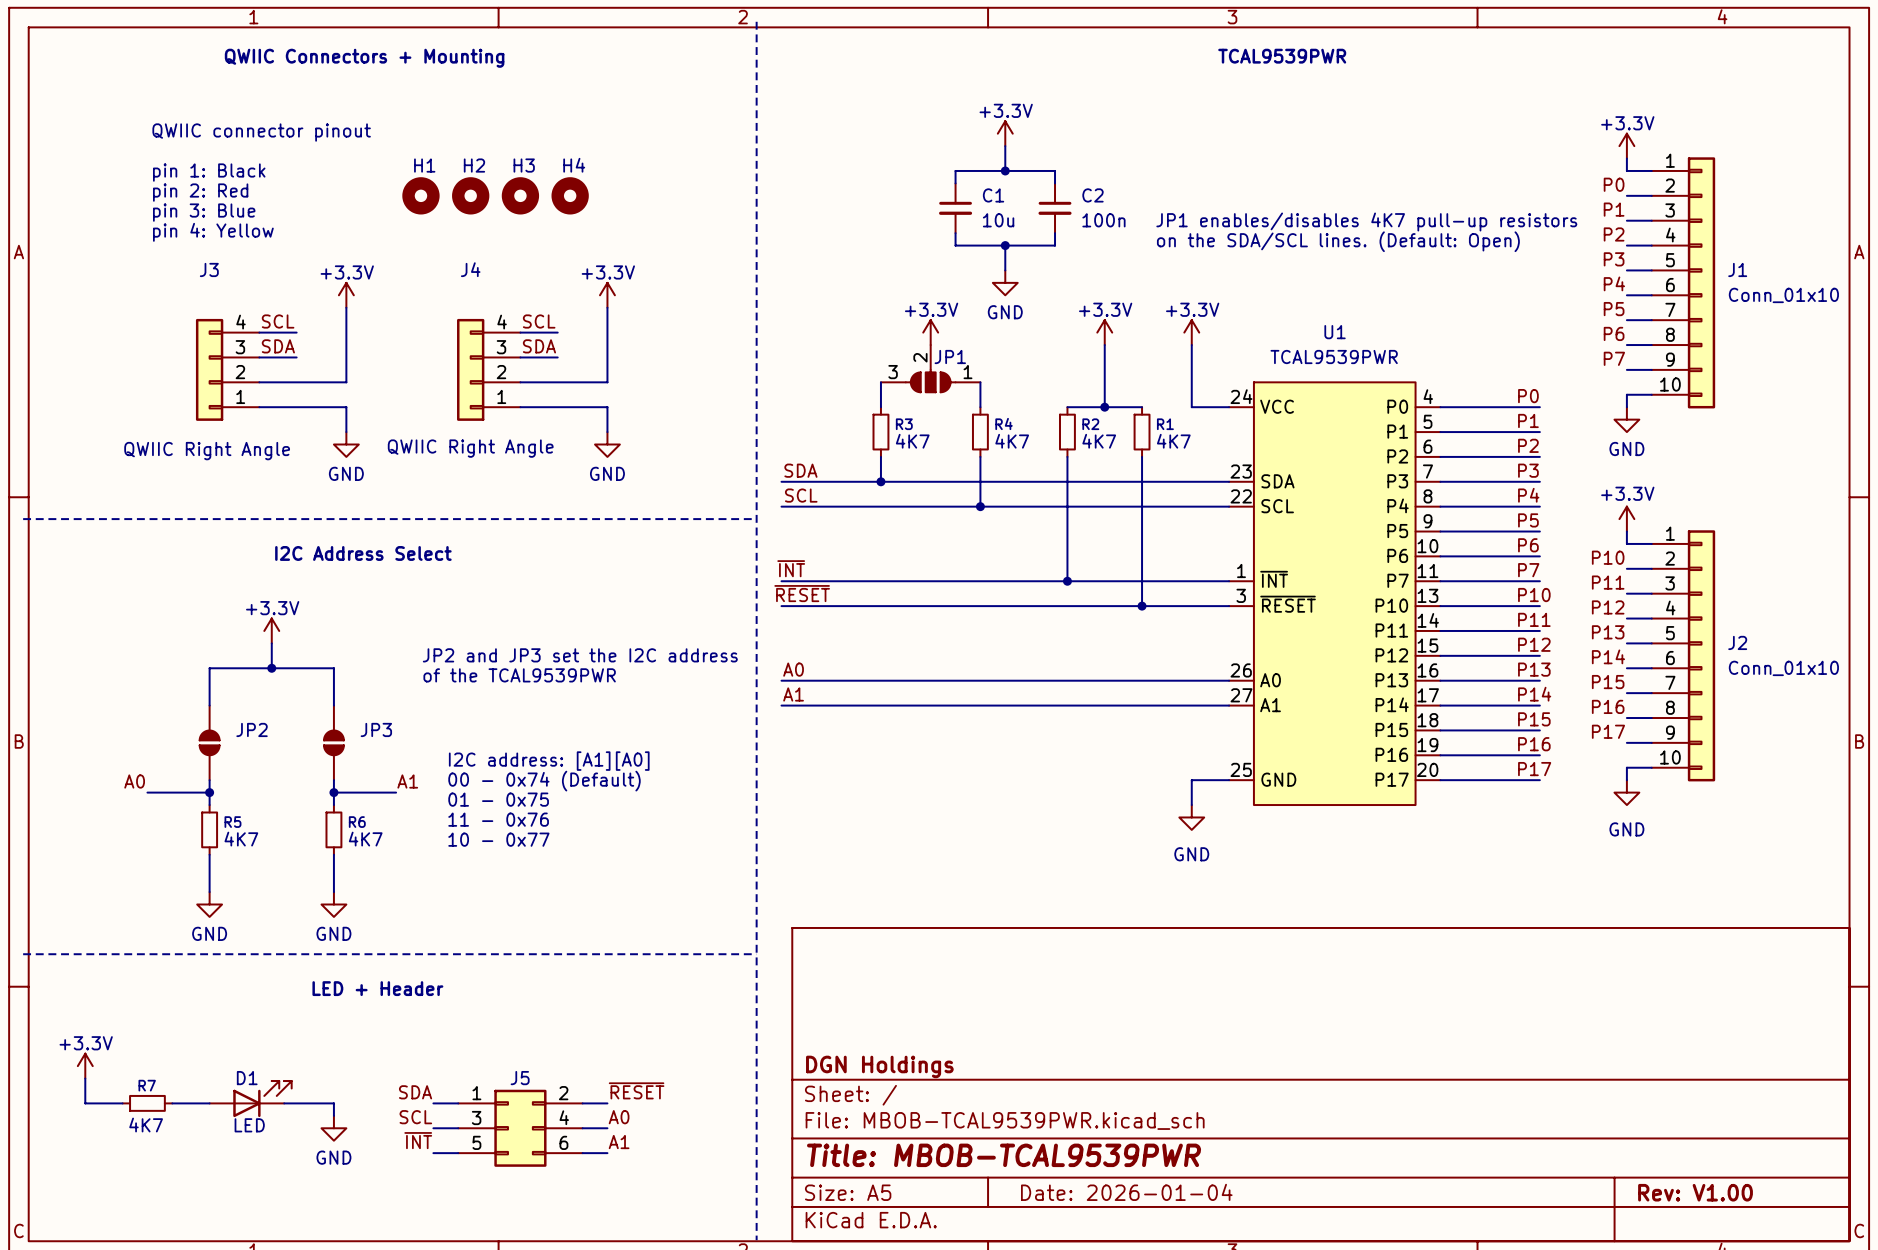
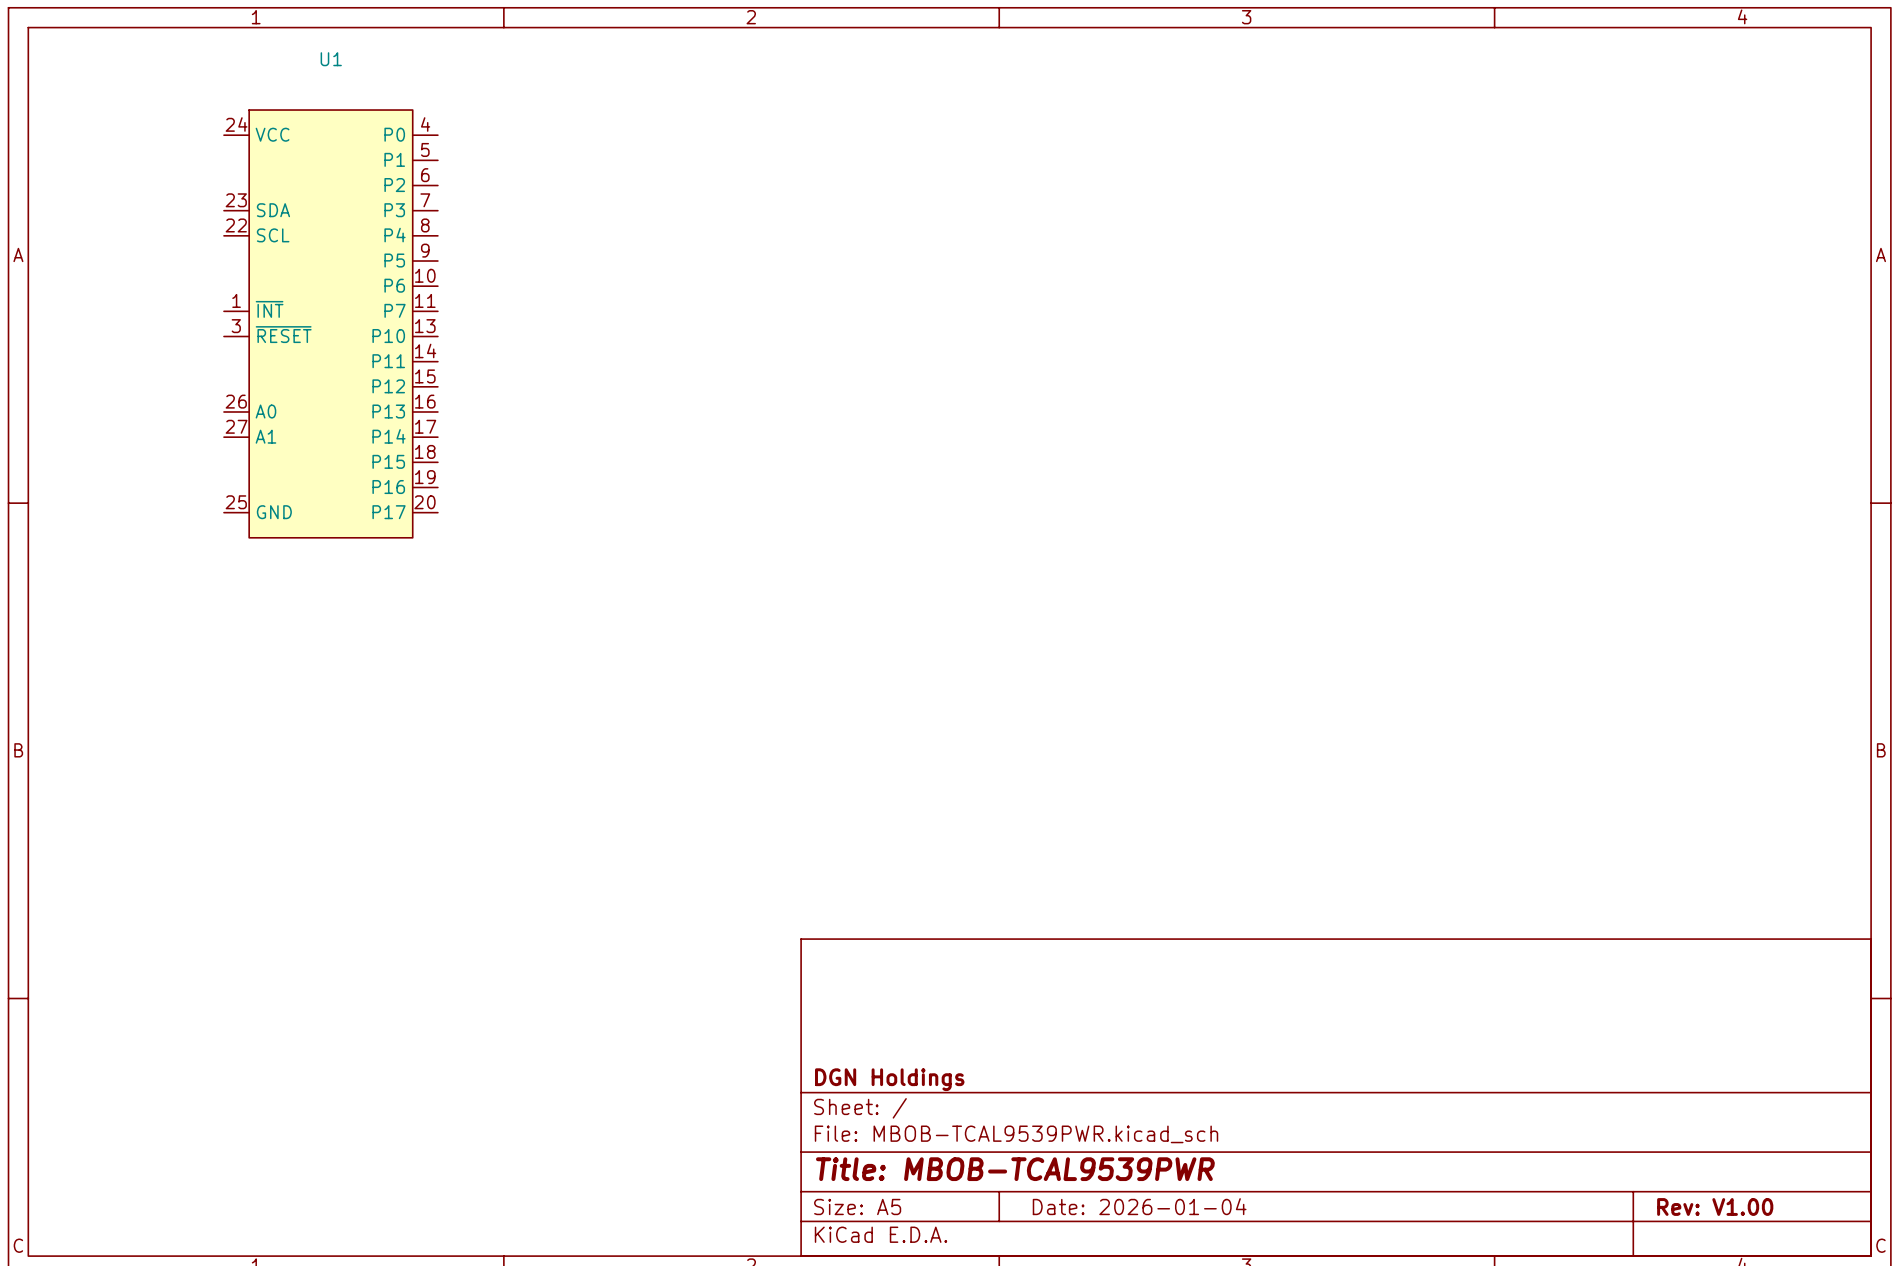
line: (756, 21) (756, 1240) -> none
text: TCAL9539PWR (1282, 56) -> none
text: QWIIC Connectors + Mounting (364, 58) -> none
text: QWIIC connector pinout (261, 132) -> none
power symbol: +3.3V (1005, 133) -> none
wire: (1005, 146) (1005, 170) -> none
power symbol: +3.3V (1626, 146) -> none
wire: (1626, 158) (1626, 170) (1651, 170) -> none
junction: (1005, 170) -> none
text: pin 1: Black (209, 172) -> none
wire: (955, 183) (955, 170) (1055, 170) (1055, 183) -> none
label: P0 (1614, 184) -> none
text: pin 2: Red (200, 192) -> none
H1: (420, 195) -> none
H2: (470, 195) -> none
H3: (520, 195) -> none
H4: (570, 195) -> none
wire: (1626, 195) (1651, 195) -> none
C1: 10u (955, 208) -> none
C2: 100n (1055, 208) -> none
label: P1 (1614, 209) -> none
text: pin 3: Blue (204, 212) -> none
wire: (1626, 220) (1651, 220) -> none
text: JP1 enables/disables 4K7 pull-up resistors (1366, 222) -> none
text: pin 4: Yellow (213, 232) -> none
wire: (955, 233) (955, 245) (1055, 245) (1055, 233) -> none
label: P2 (1614, 234) -> none
text: on the SDA/SCL lines. (Default: Open) (1338, 241) -> none
wire: (1005, 245) (1005, 270) -> none
junction: (1005, 245) -> none
wire: (1626, 245) (1651, 245) -> none
label: P3 (1614, 259) -> none
wire: (1626, 270) (1651, 270) -> none
power symbol: GND (1005, 282) -> none
J1: Conn_01x10 (1683, 282) -> none
label: P4 (1614, 283) -> none
power symbol: +3.3V (346, 295) -> none
power symbol: +3.3V (607, 295) -> none
wire: (1626, 295) (1651, 295) -> none
wire: (607, 307) (607, 382) (520, 382) -> none
label: P5 (1614, 309) -> none
wire: (1626, 320) (1651, 320) -> none
label: SCL (278, 321) -> none
label: SCL (539, 321) -> none
wire: (520, 332) (557, 332) -> none
power symbol: +3.3V (930, 332) -> none
power symbol: +3.3V (1104, 332) -> none
power symbol: +3.3V (1191, 332) -> none
label: P6 (1614, 333) -> none
wire: (1104, 345) (1104, 407) -> none
wire: (1191, 345) (1191, 407) (1229, 407) -> none
wire: (1626, 345) (1651, 345) -> none
label: SDA (278, 346) -> none
label: SDA (539, 346) -> none
wire: (520, 357) (557, 357) -> none
U1 value: TCAL9539PWR (1334, 357) -> none
label: P7 (1614, 358) -> none
JP1: (930, 368) -> none
J3: QWIIC Right Angle (227, 369) -> none
J4: QWIIC Right Angle (488, 369) -> none
wire: (1626, 369) (1651, 369) -> none
wire: (880, 382) (880, 407) -> none
wire: (980, 382) (980, 407) -> none
wire: (1651, 394) (1626, 394) (1626, 407) -> none
label: P0 (1528, 396) -> none
wire: (520, 407) (607, 407) (607, 432) -> none
wire: (1067, 407) (1142, 407) -> none
junction: (1104, 407) -> none
wire: (1440, 407) (1539, 407) -> none
power symbol: GND (1626, 419) -> none
label: P1 (1528, 420) -> none
R3: 4K7 (880, 432) -> none
R4: 4K7 (980, 432) -> none
R2: 4K7 (1067, 432) -> none
R1: 4K7 (1142, 432) -> none
wire: (1440, 432) (1539, 432) -> none
power symbol: GND (346, 444) -> none
power symbol: GND (607, 444) -> none
label: P2 (1528, 445) -> none
wire: (880, 456) (880, 481) -> none
wire: (980, 456) (980, 506) -> none
wire: (1067, 456) (1067, 581) -> none
wire: (1142, 456) (1142, 606) -> none
wire: (1440, 456) (1539, 456) -> none
label: SDA (800, 470) -> none
label: P3 (1528, 470) -> none
wire: (781, 481) (1229, 481) -> none
junction: (880, 481) -> none
wire: (1440, 481) (1539, 481) -> none
label: SCL (801, 495) -> none
label: P4 (1528, 495) -> none
wire: (781, 506) (1229, 506) -> none
junction: (980, 506) -> none
wire: (1440, 506) (1539, 506) -> none
line: (23, 519) (756, 519) -> none
power symbol: +3.3V (1626, 519) -> none
label: P5 (1528, 520) -> none
wire: (1440, 531) (1539, 531) -> none
wire: (1626, 531) (1626, 543) (1651, 543) -> none
label: P6 (1528, 545) -> none
text: I2C Address Select (363, 553) -> none
wire: (1440, 556) (1539, 556) -> none
label: P10 (1608, 557) -> none
label: ~{INT} (791, 568) -> none
wire: (1626, 568) (1651, 568) -> none
label: P7 (1528, 570) -> none
wire: (781, 581) (1229, 581) -> none
junction: (1067, 581) -> none
wire: (1440, 581) (1539, 581) -> none
label: P11 (1608, 582) -> none
label: ~{RESET} (802, 593) -> none
U1 position: (1334, 593) -> (330, 323)
wire: (1626, 593) (1651, 593) -> none
label: P10 (1534, 595) -> none
wire: (781, 606) (1229, 606) -> none
junction: (1142, 606) -> none
wire: (1440, 606) (1539, 606) -> none
label: P12 (1608, 607) -> none
wire: (1626, 618) (1651, 618) -> none
label: P11 (1534, 619) -> none
power symbol: +3.3V (271, 630) -> none
wire: (1440, 630) (1539, 630) -> none
label: P13 (1608, 632) -> none
wire: (271, 643) (271, 668) -> none
wire: (1626, 643) (1651, 643) -> none
label: P12 (1534, 644) -> none
text: JP2 and JP3 set the I2C address (580, 655) -> none
wire: (1440, 655) (1539, 655) -> none
J2: Conn_01x10 (1683, 655) -> none
label: P14 (1608, 656) -> none
junction: (271, 668) -> none
wire: (1626, 668) (1651, 668) -> none
label: A0 (793, 669) -> none
label: P13 (1534, 669) -> none
text: of the TCAL9539PWR (519, 675) -> none
wire: (781, 680) (1229, 680) -> none
wire: (1440, 680) (1539, 680) -> none
label: P15 (1608, 682) -> none
wire: (1626, 693) (1651, 693) -> none
label: A1 (793, 694) -> none
label: P14 (1534, 694) -> none
wire: (209, 705) (209, 668) (333, 668) (333, 705) -> none
wire: (781, 705) (1229, 705) -> none
wire: (1440, 705) (1539, 705) -> none
label: P16 (1608, 706) -> none
wire: (1626, 718) (1651, 718) -> none
label: P15 (1534, 719) -> none
wire: (1440, 730) (1539, 730) -> none
label: P17 (1608, 731) -> none
JP2: (209, 742) -> none
JP3: (333, 742) -> none
wire: (1626, 742) (1651, 742) -> none
label: P16 (1534, 744) -> none
wire: (1440, 755) (1539, 755) -> none
text: I2C address: [A1][A0] (549, 761) -> none
wire: (1651, 767) (1626, 767) (1626, 780) -> none
label: P17 (1534, 769) -> none
wire: (209, 780) (209, 805) -> none
wire: (333, 780) (333, 805) -> none
wire: (1229, 780) (1191, 780) (1191, 805) -> none
wire: (1440, 780) (1539, 780) -> none
label: A0 (134, 781) -> none
label: A1 (407, 781) -> none
text: 00 - 0x74 (Default) (544, 781) -> none
wire: (147, 792) (209, 792) -> none
junction: (209, 792) -> none
wire: (333, 792) (396, 792) -> none
junction: (333, 792) -> none
power symbol: GND (1626, 792) -> none
text: 01 - 0x75 (498, 799) -> none
power symbol: GND (1191, 817) -> none
text: 11 - 0x76 (498, 819) -> none
R5: 4K7 (209, 829) -> none
R6: 4K7 (333, 829) -> none
text: 10 - 0x77 (498, 839) -> none
wire: (209, 854) (209, 892) -> none
wire: (333, 854) (333, 892) -> none
power symbol: GND (209, 904) -> none
power symbol: GND (333, 904) -> none
line: (23, 954) (756, 954) -> none
text: LED + Header (377, 988) -> none
power symbol: +3.3V (85, 1066) -> none
wire: (85, 1078) (85, 1103) (122, 1103) -> none
label: ~{RESET} (636, 1090) -> none
label: SDA (415, 1092) -> none
D1: LED (250, 1099) -> none
R7: 4K7 (147, 1103) -> none
wire: (172, 1103) (209, 1103) -> none
wire: (284, 1103) (333, 1103) (333, 1115) -> none
wire: (433, 1103) (458, 1103) -> none
wire: (582, 1103) (607, 1103) -> none
label: SCL (415, 1117) -> none
label: A0 (619, 1117) -> none
power symbol: GND (333, 1128) -> none
wire: (433, 1128) (458, 1128) -> none
J5: (520, 1128) -> none
wire: (582, 1128) (607, 1128) -> none
label: ~{INT} (418, 1140) -> none
label: A1 (619, 1142) -> none
wire: (433, 1153) (458, 1153) -> none
wire: (582, 1153) (607, 1153) -> none

